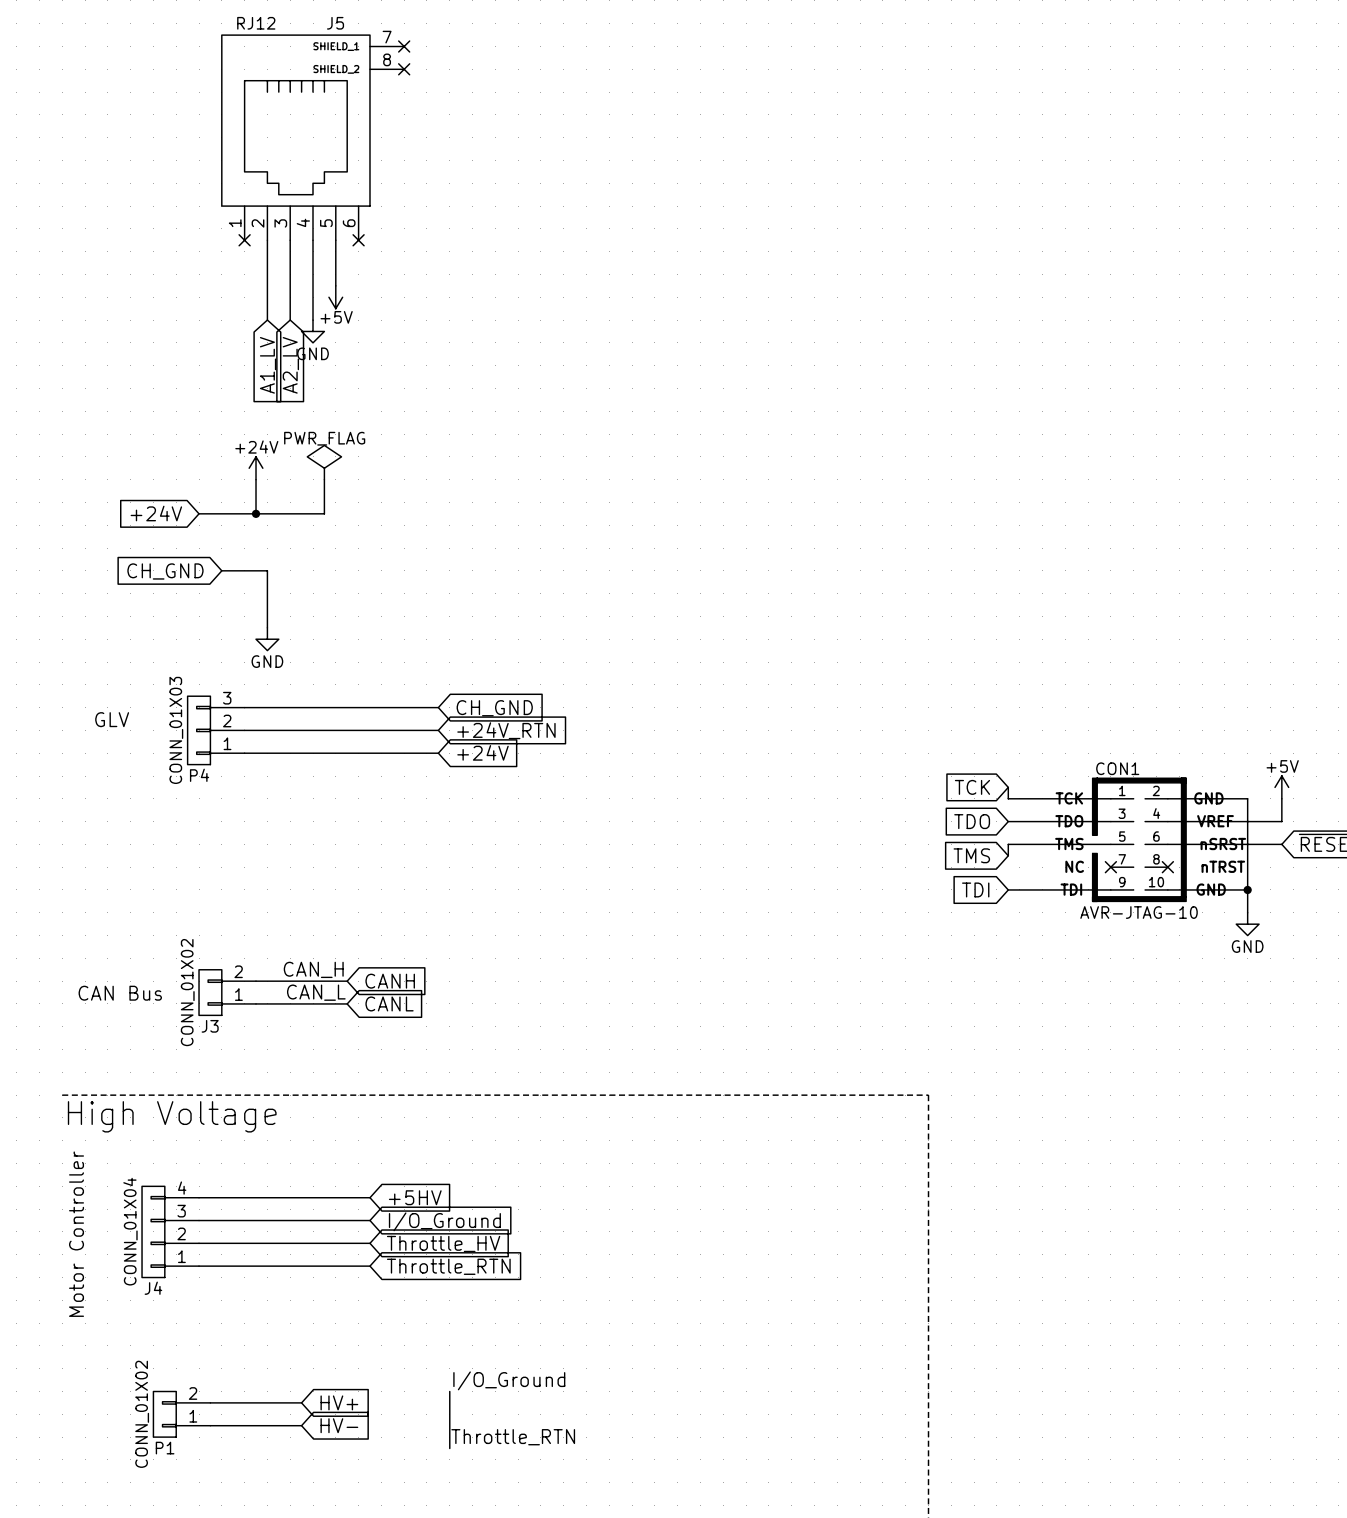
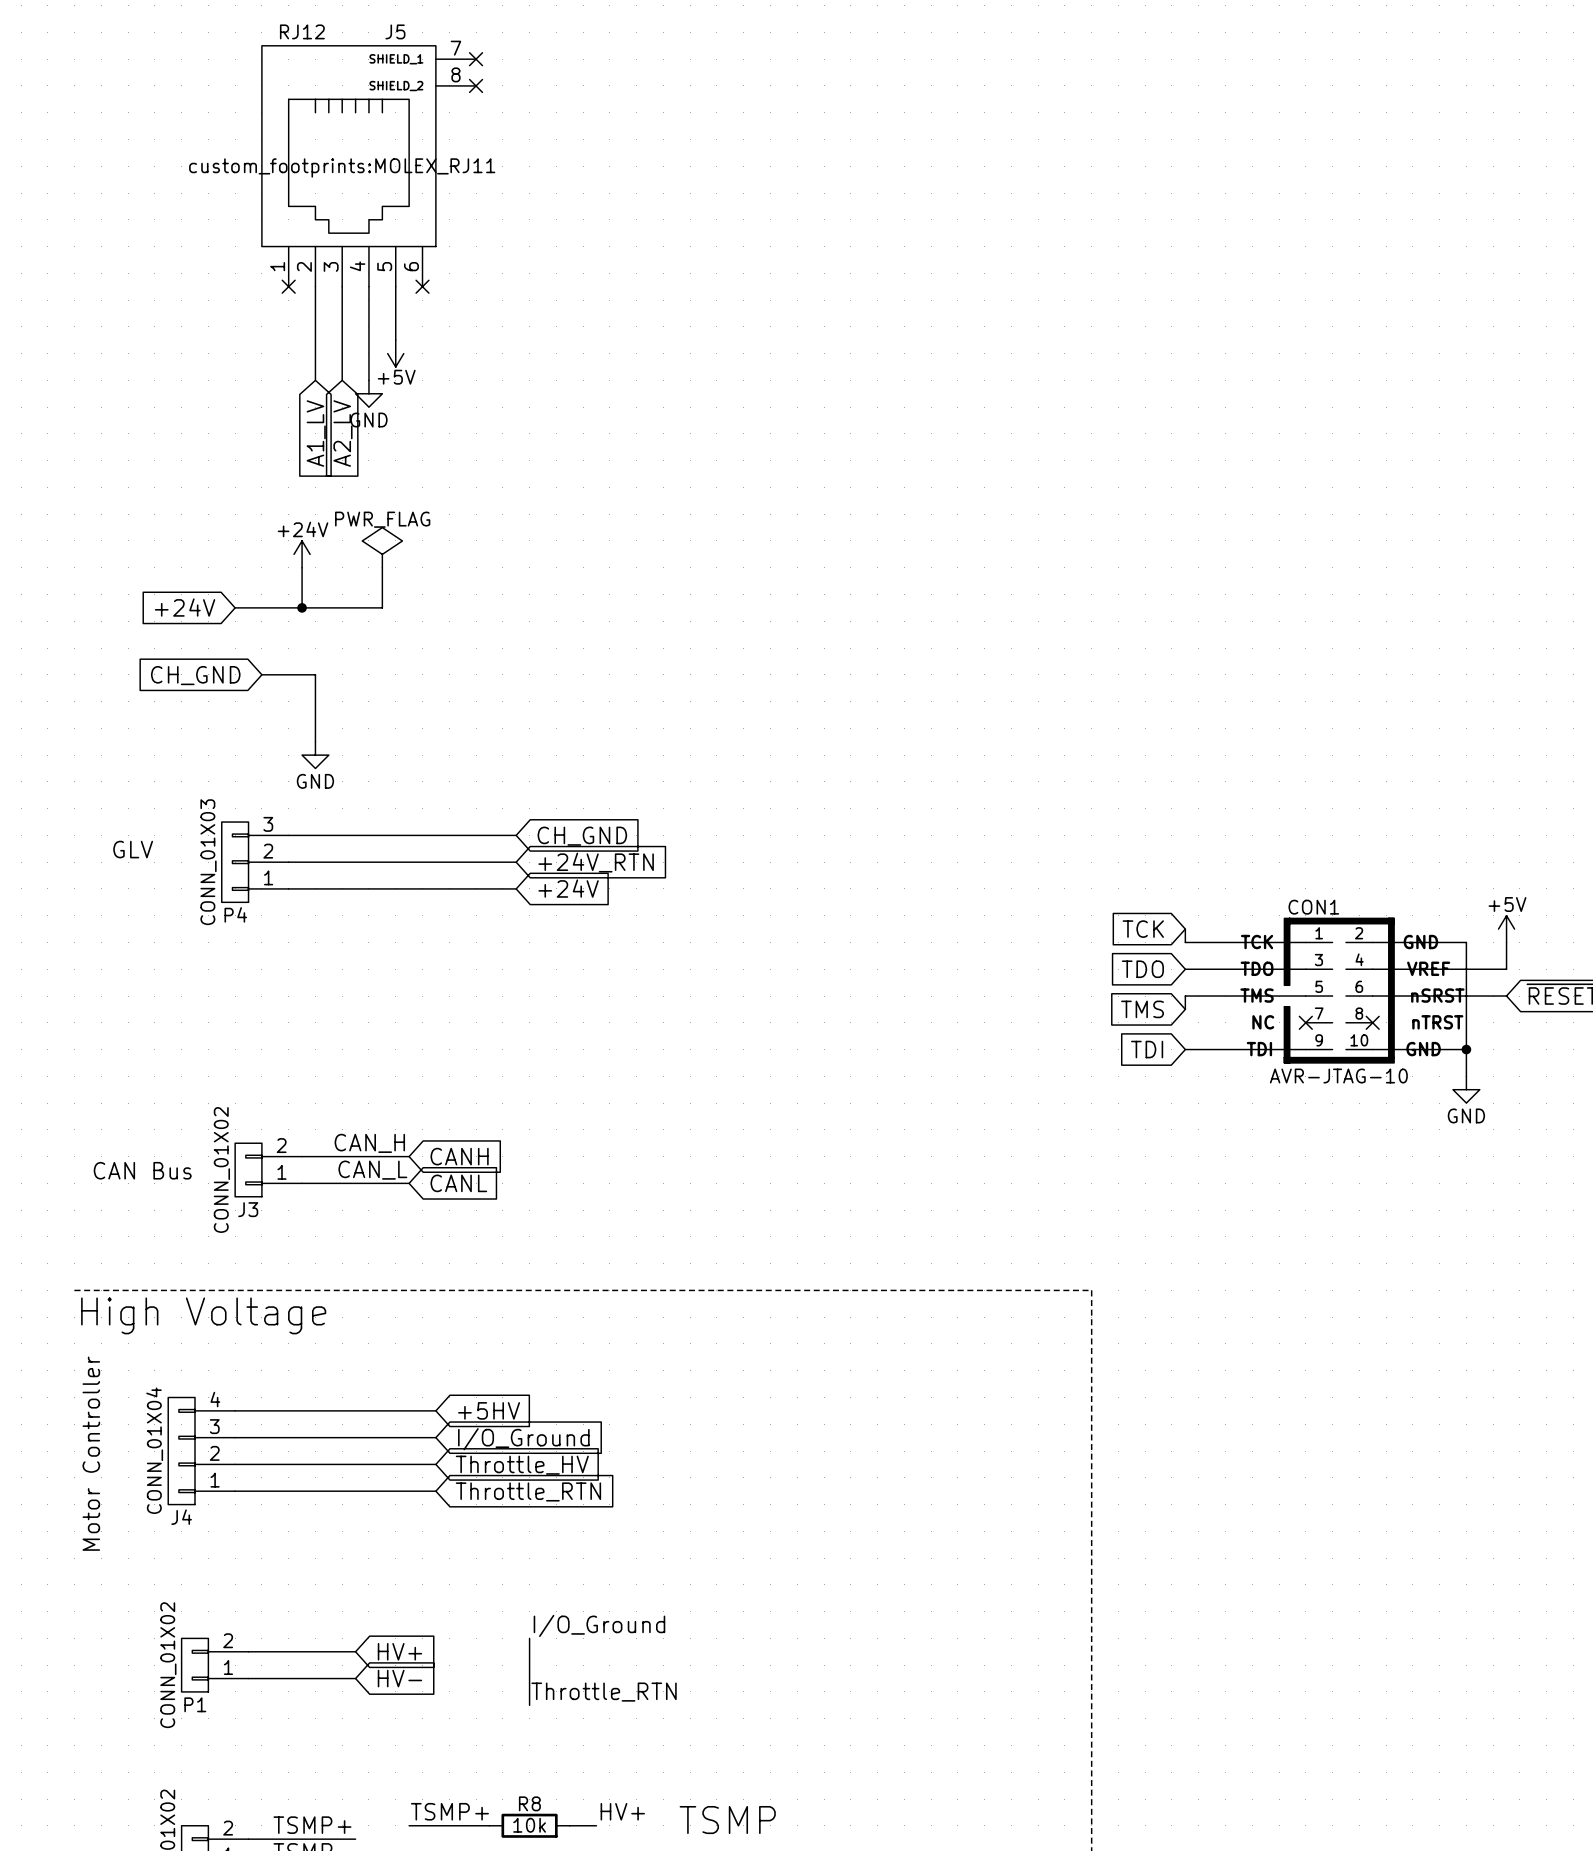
J5 text: none -> custom_footprints:MOLEX_RJ11 (342, 167)

